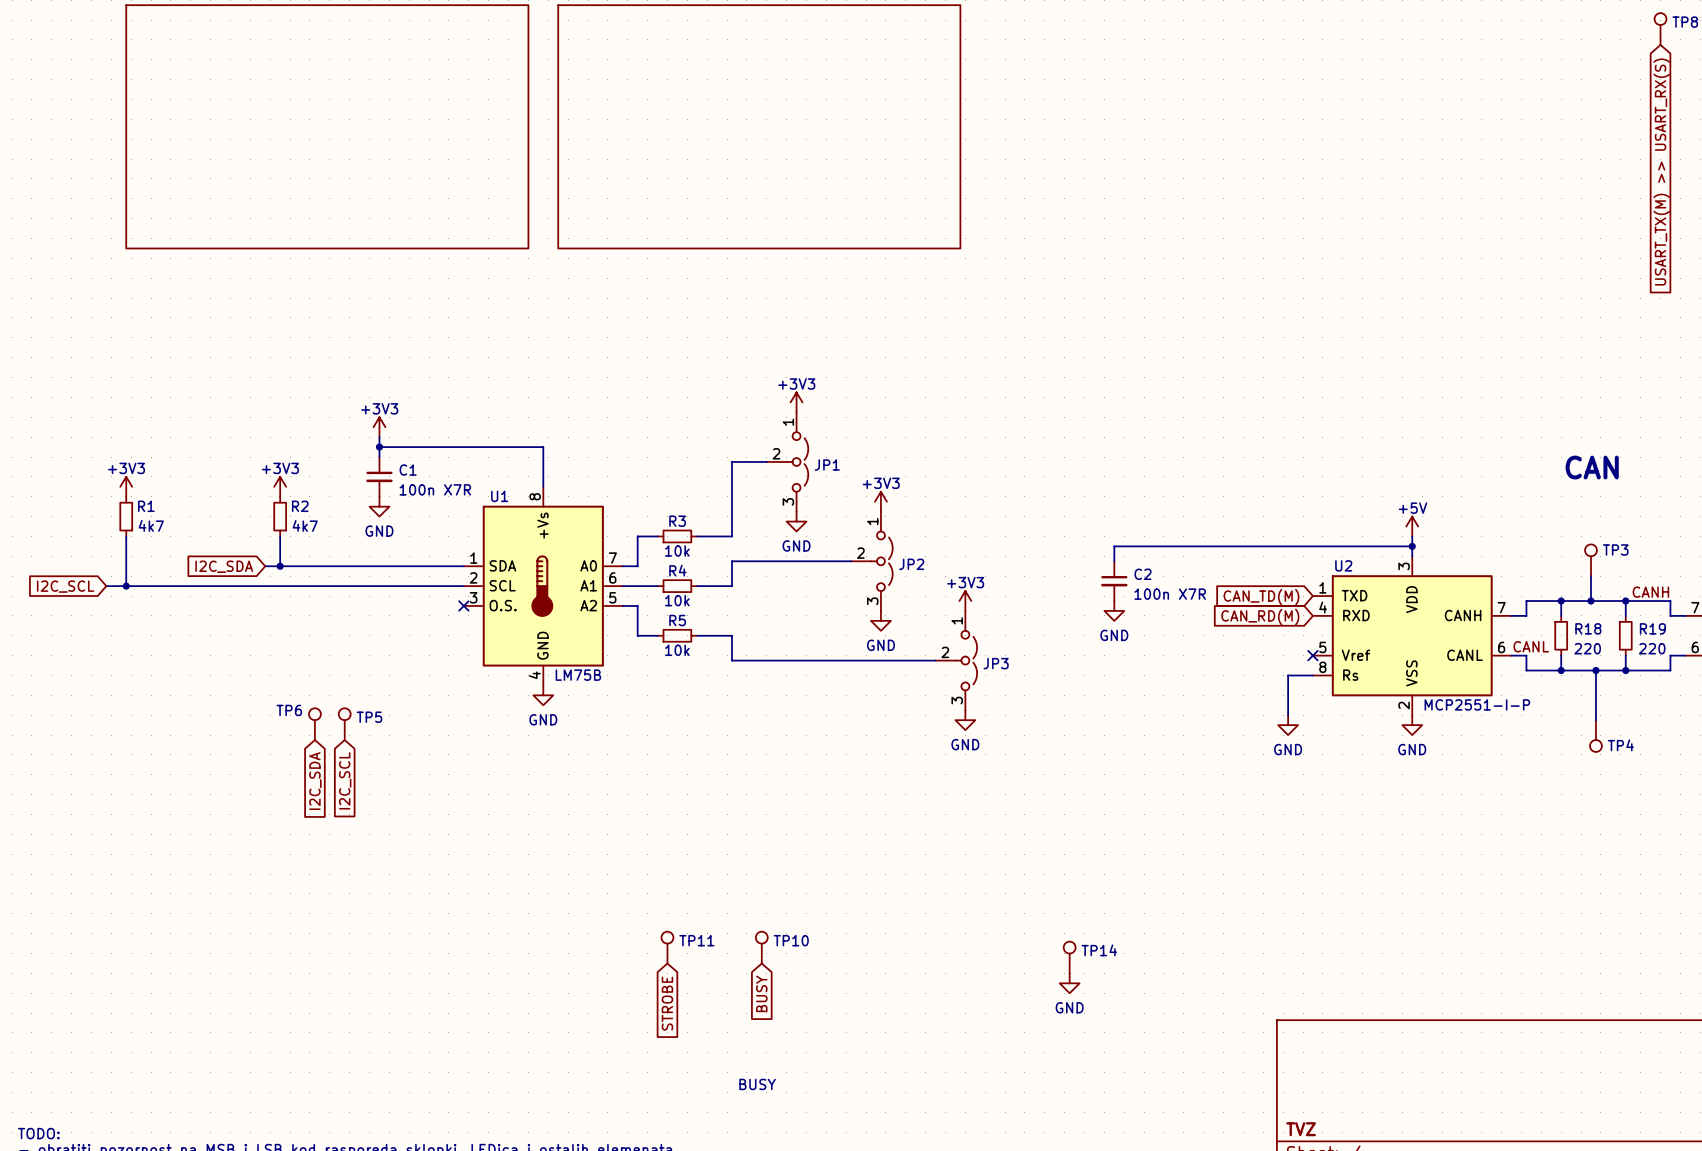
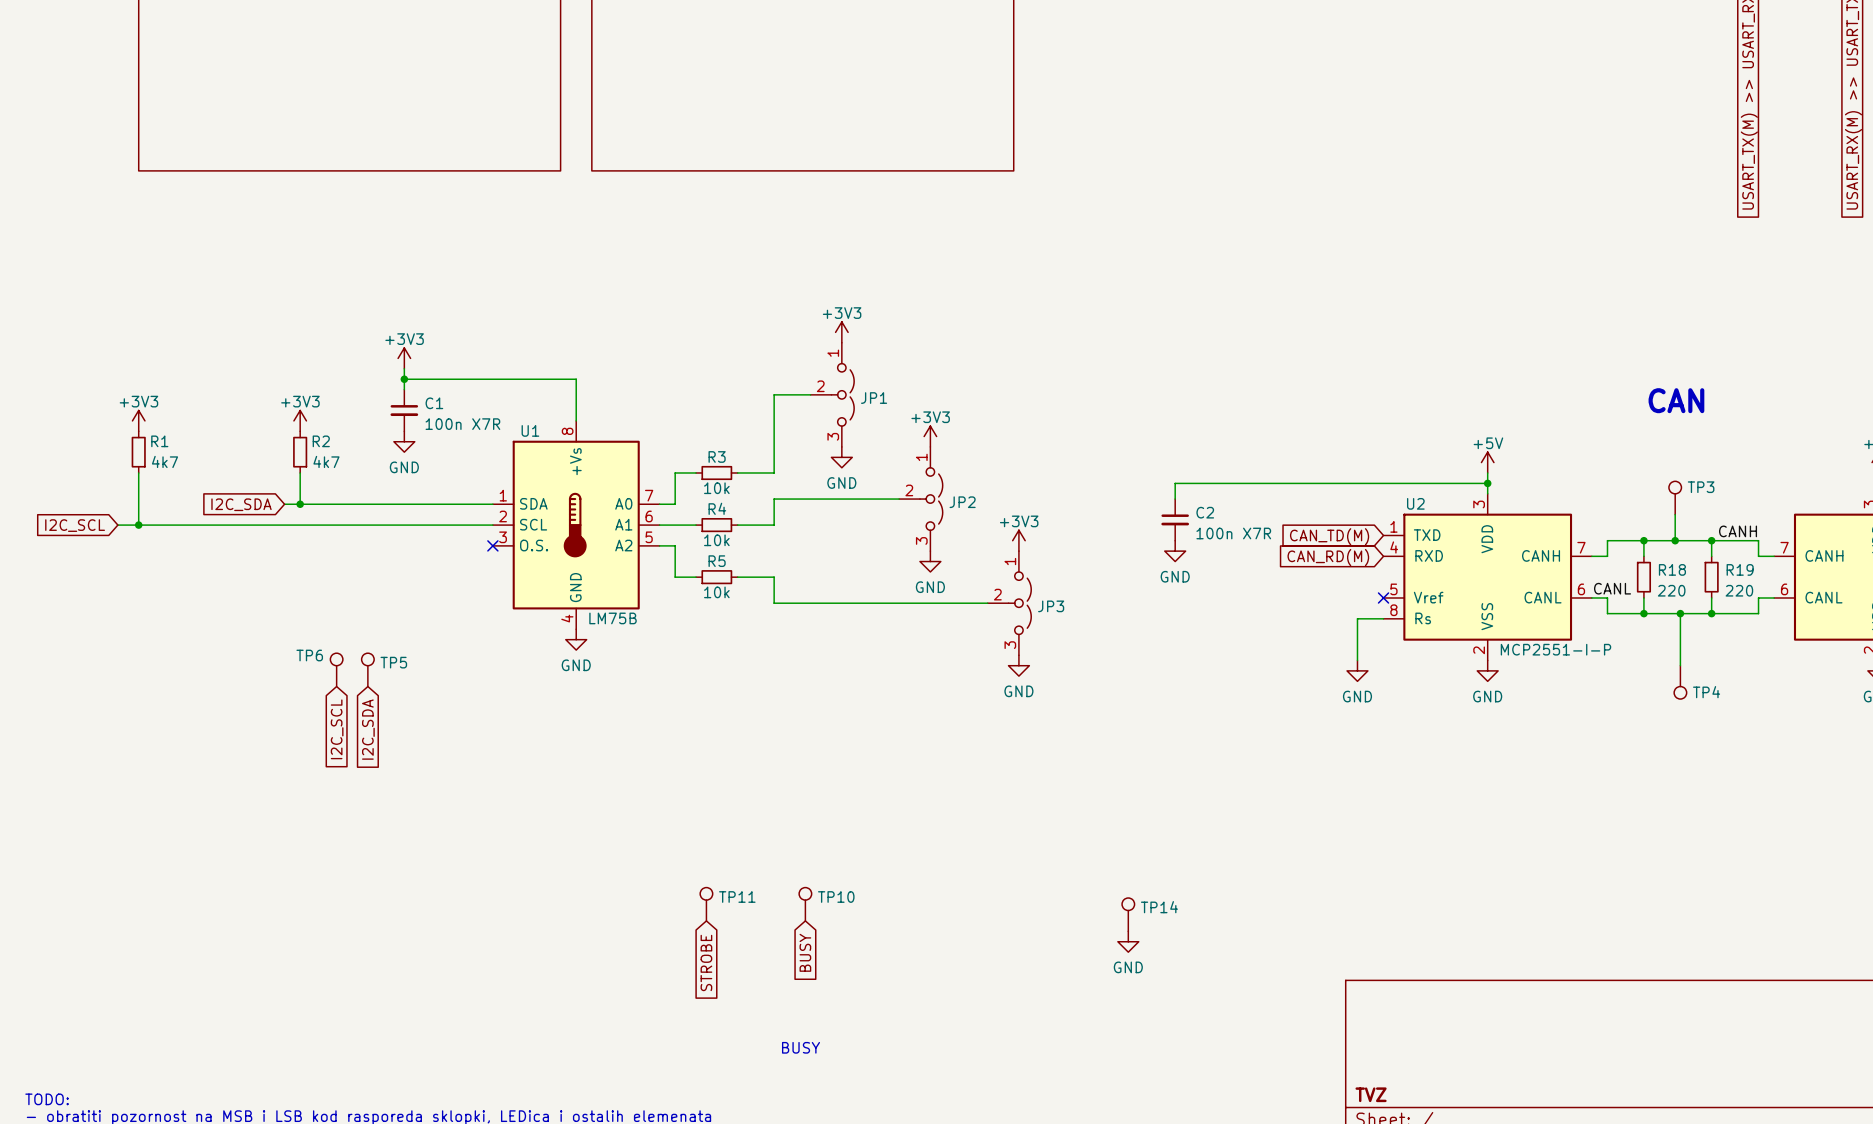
global label: I2C_SCL (345, 780) -> I2C_SDA (368, 729)
global label: I2C_SDA (315, 781) -> I2C_SCL (337, 729)

